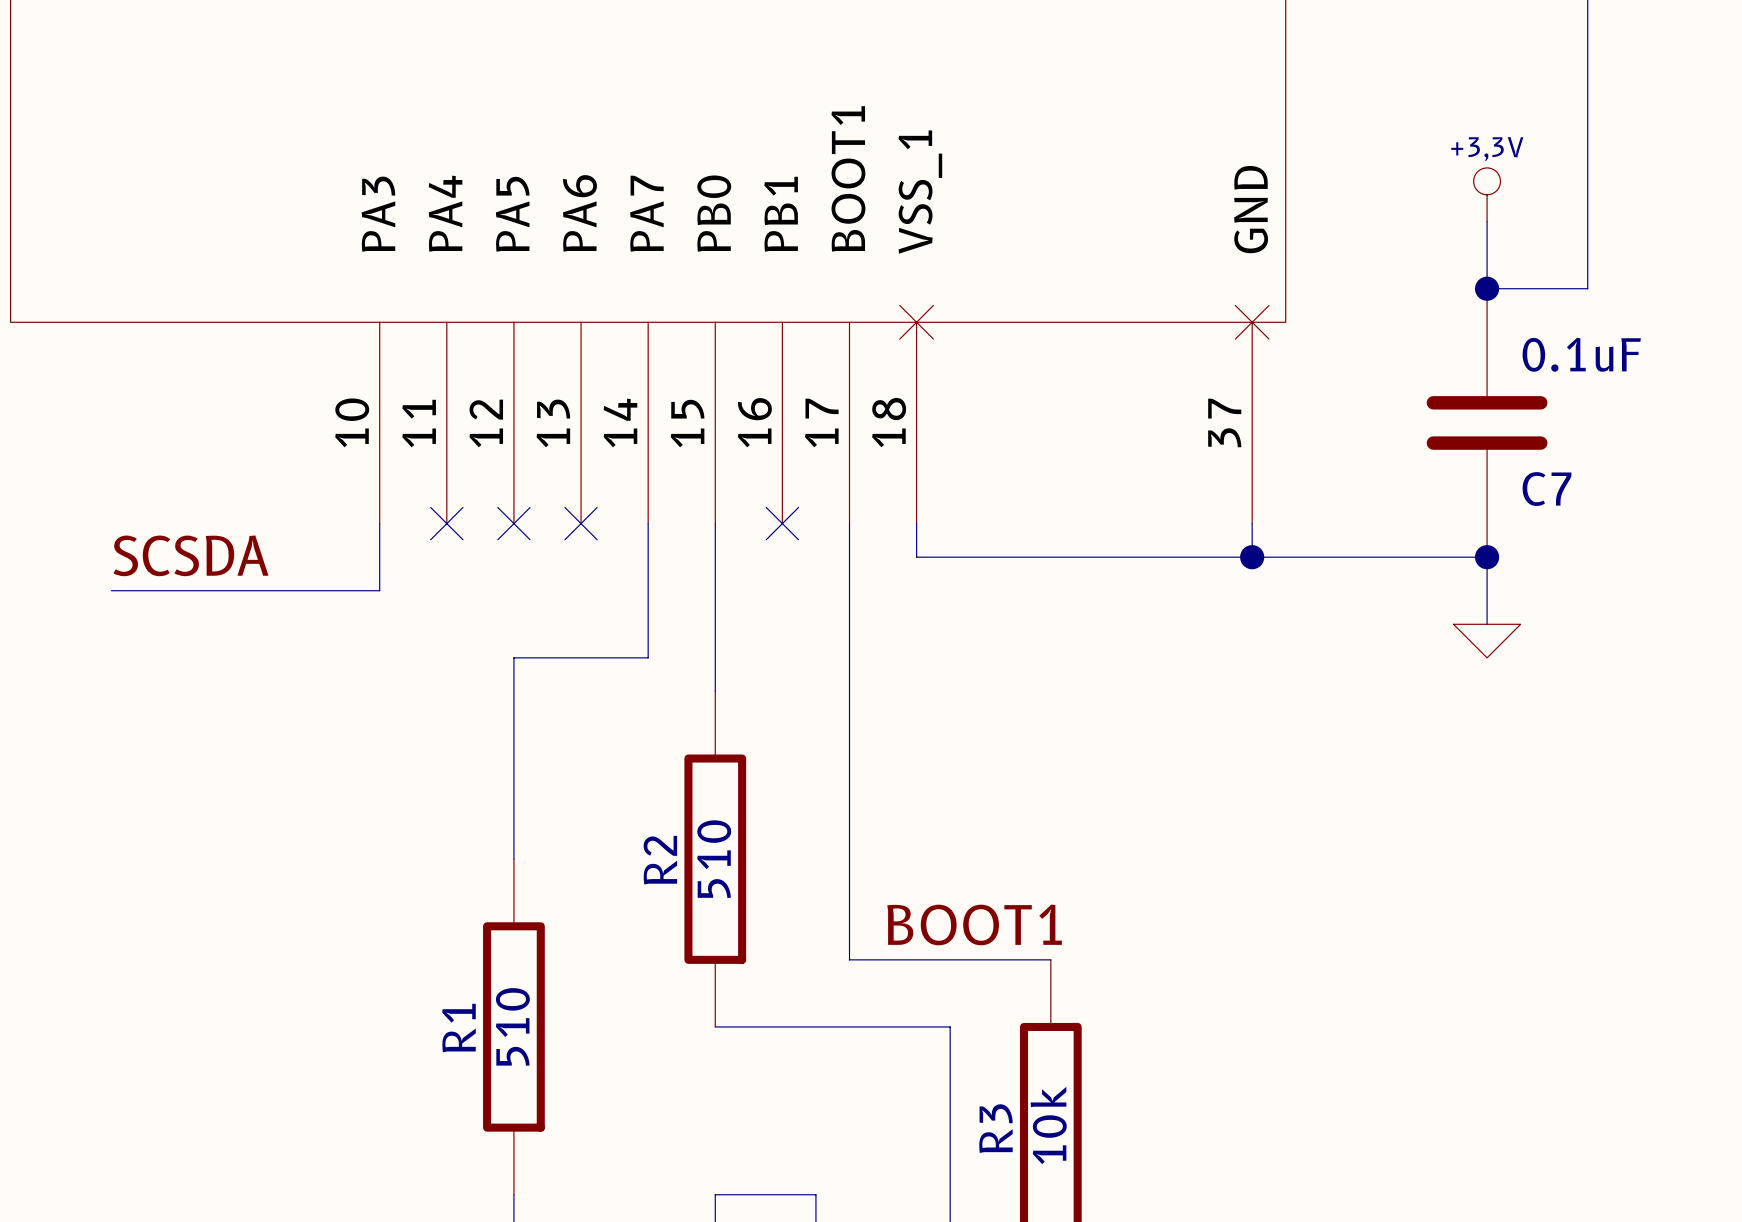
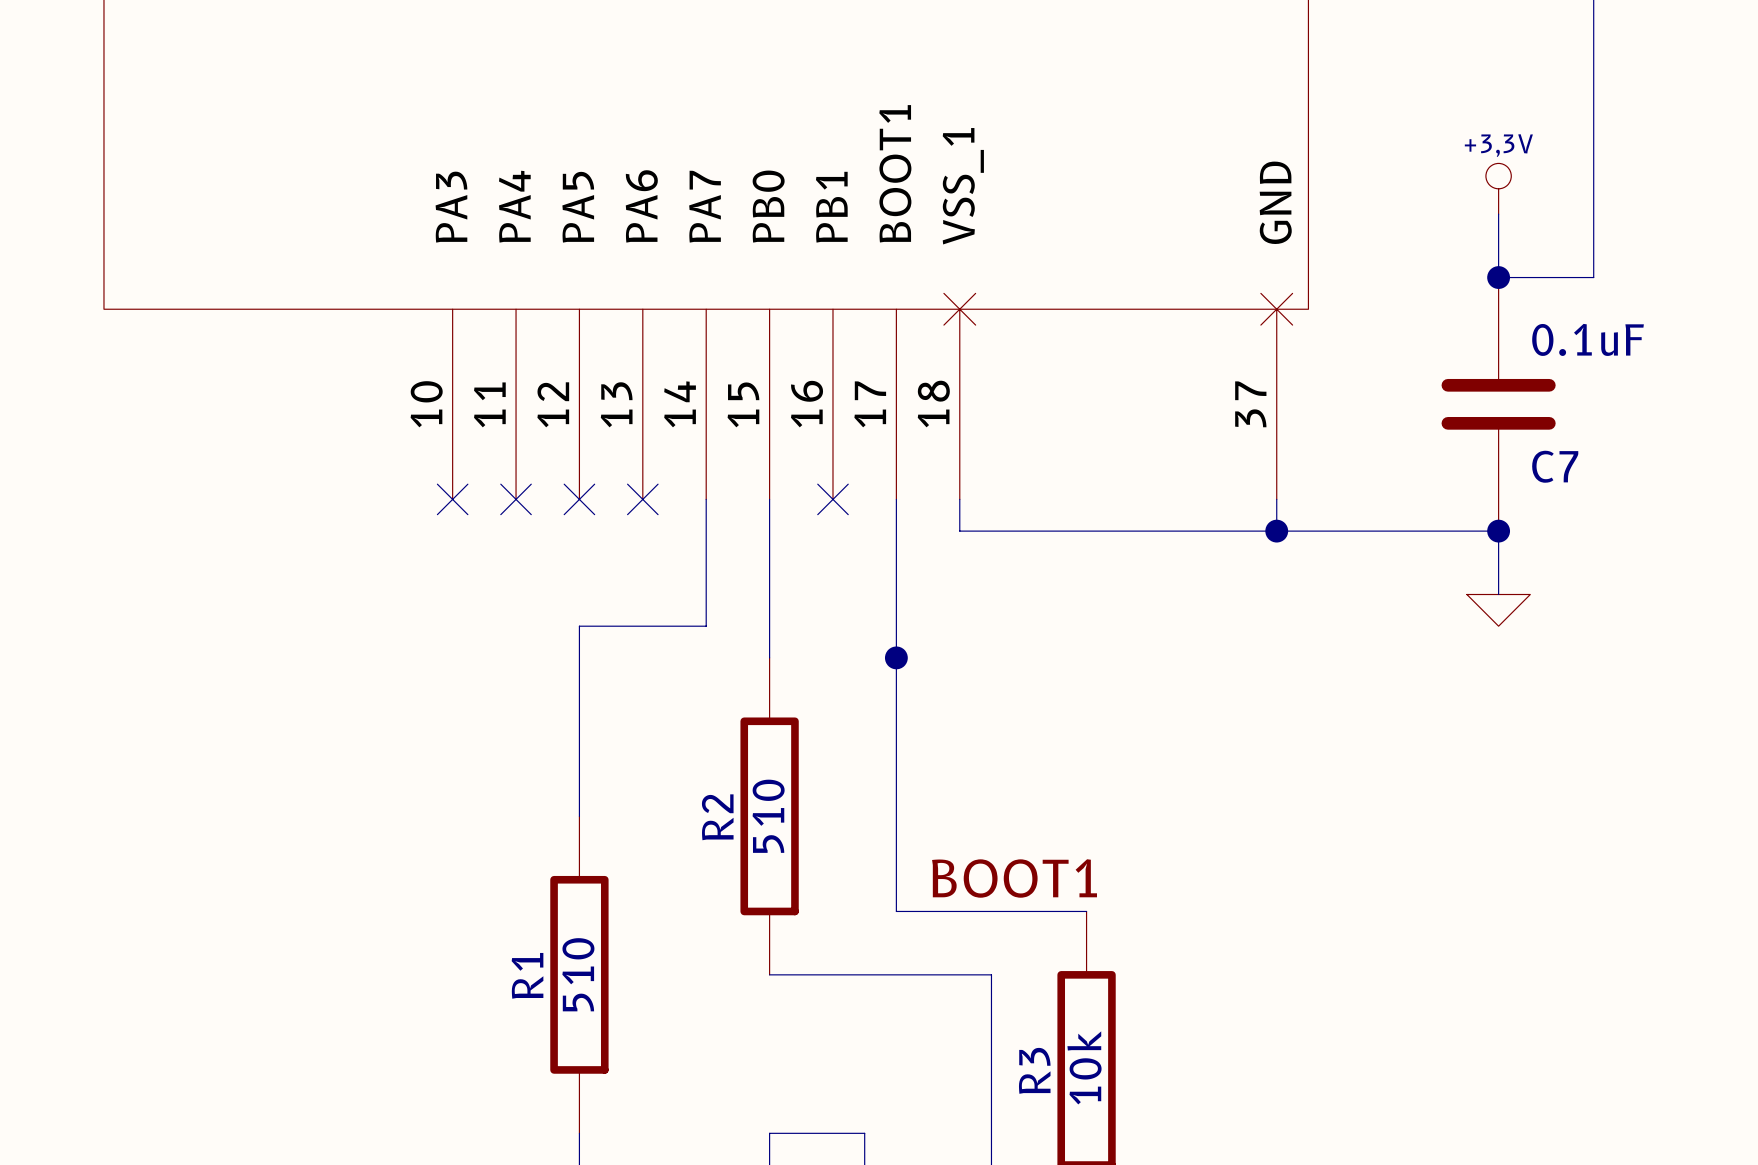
wire: (379, 523) (379, 590) (111, 590) -> none
no-connect mark: none -> (452, 499)
label: SCSDA (190, 555) -> none
junction: none -> (896, 657)

